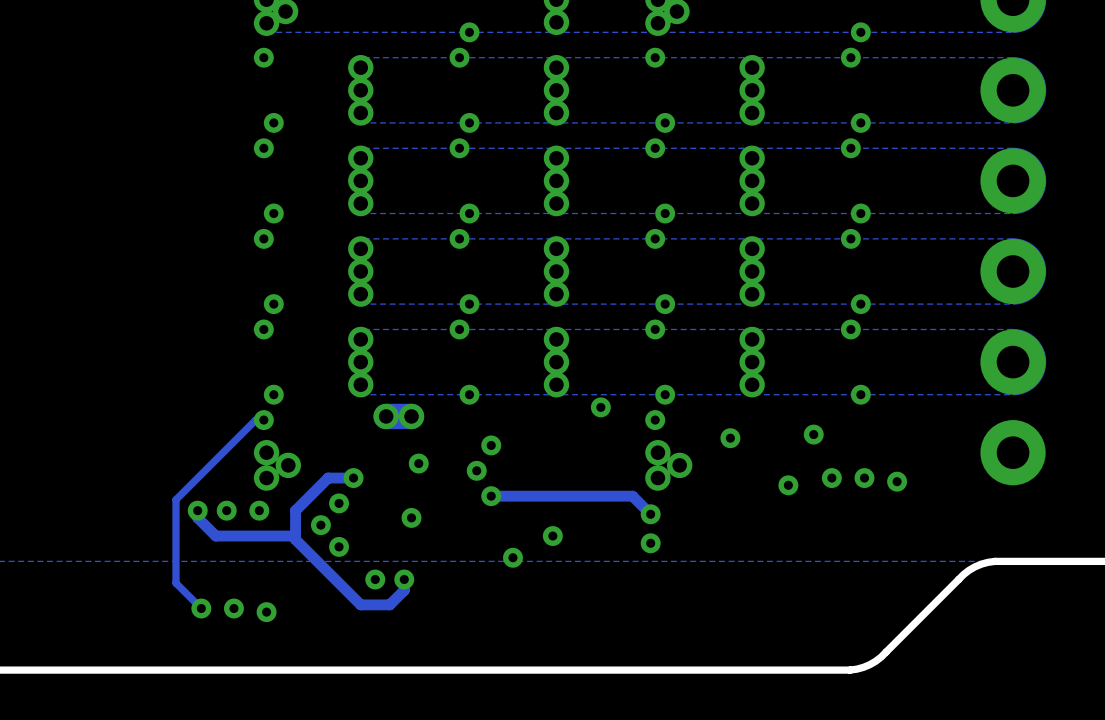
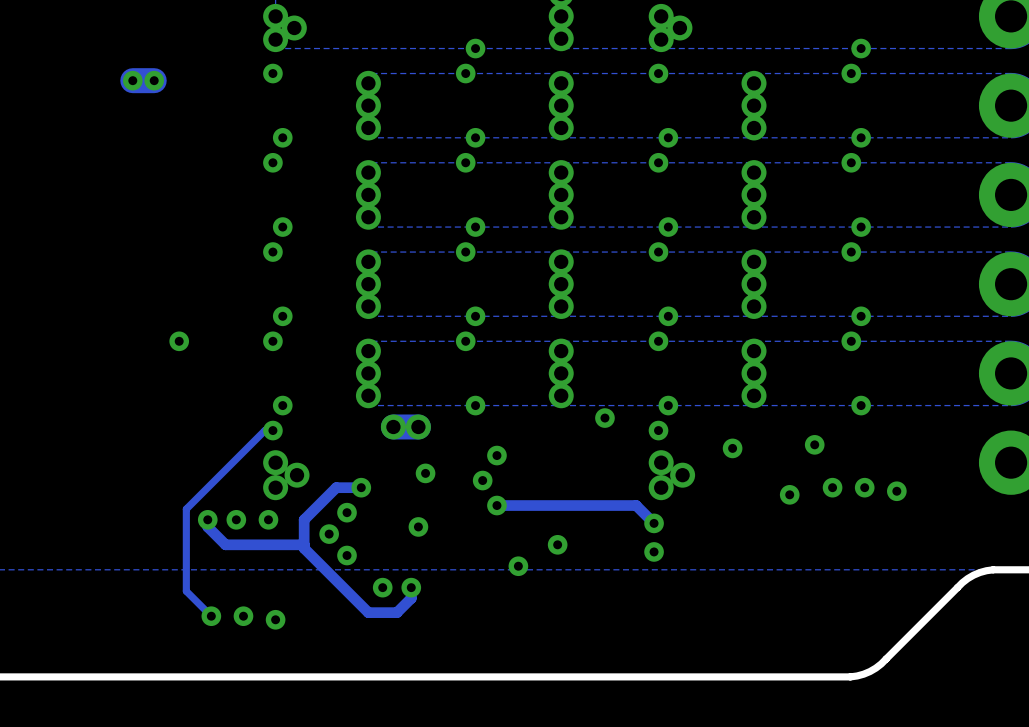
via: none -> (132, 80)
track: none -> (154, 80) (132, 80)
via: none -> (154, 80)
via: none -> (179, 341)

